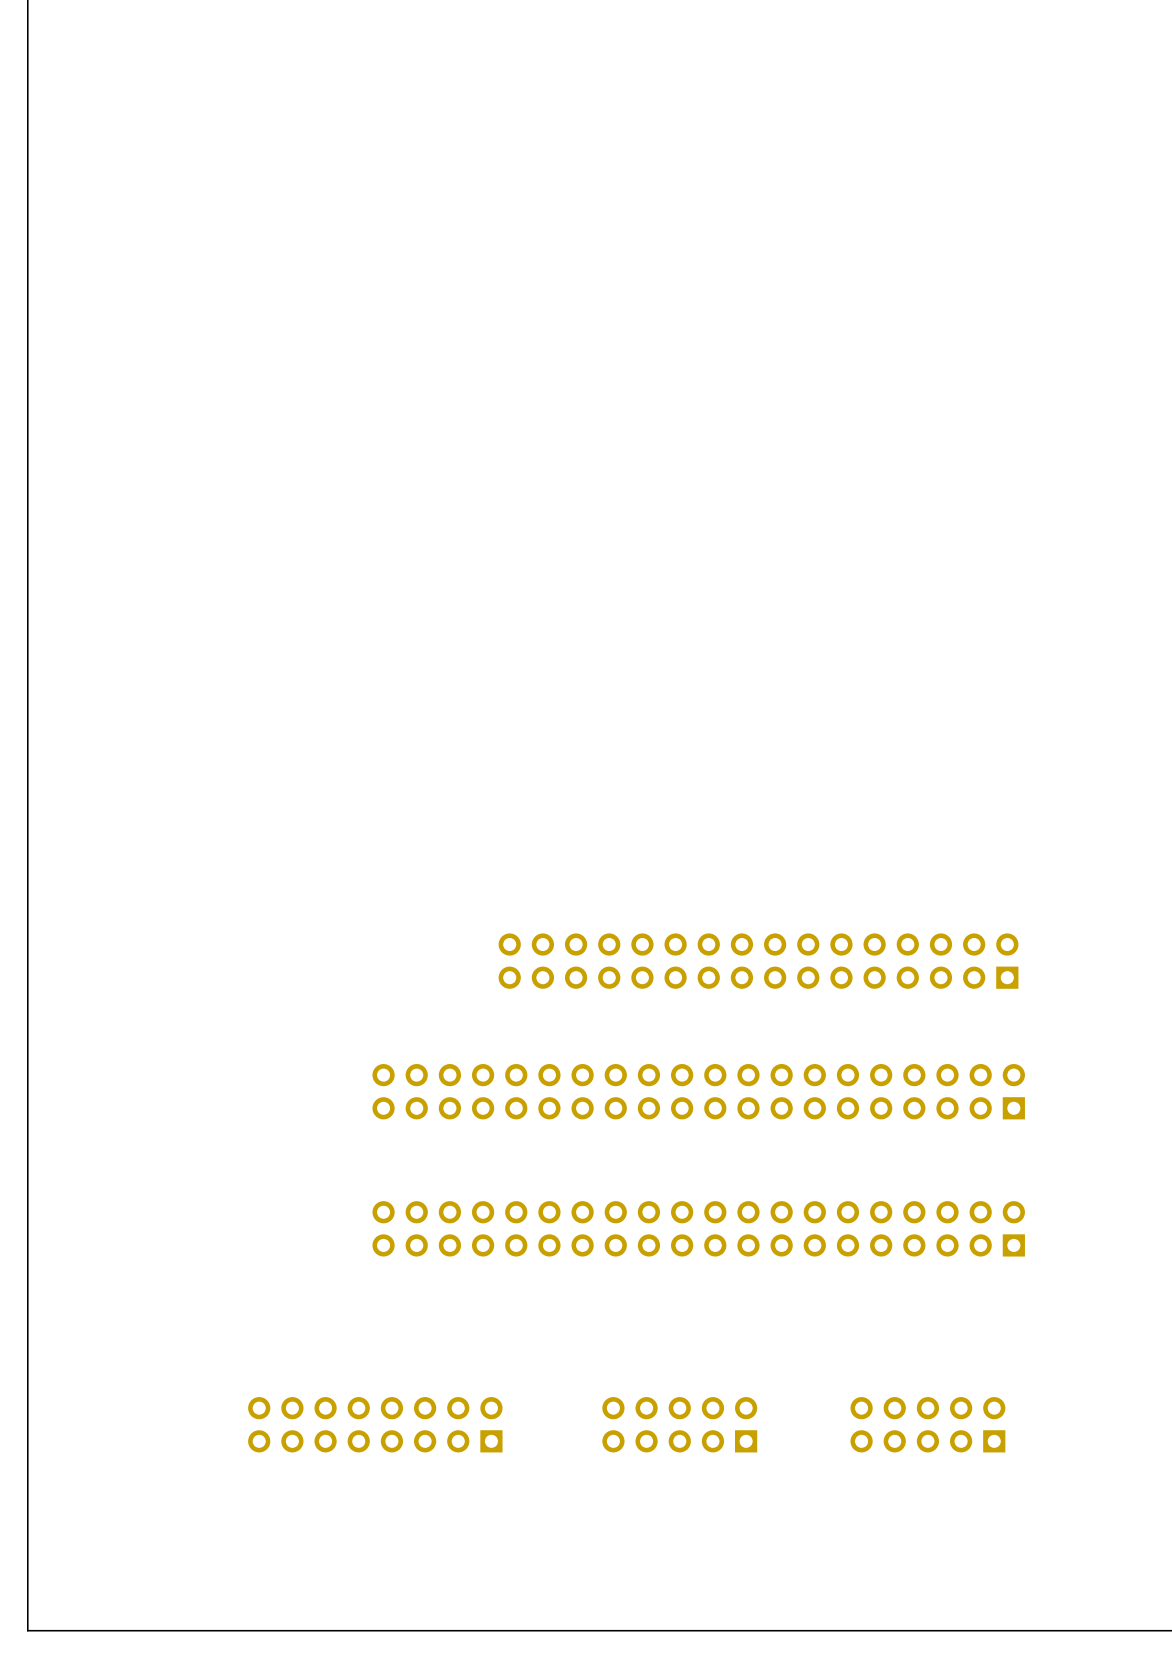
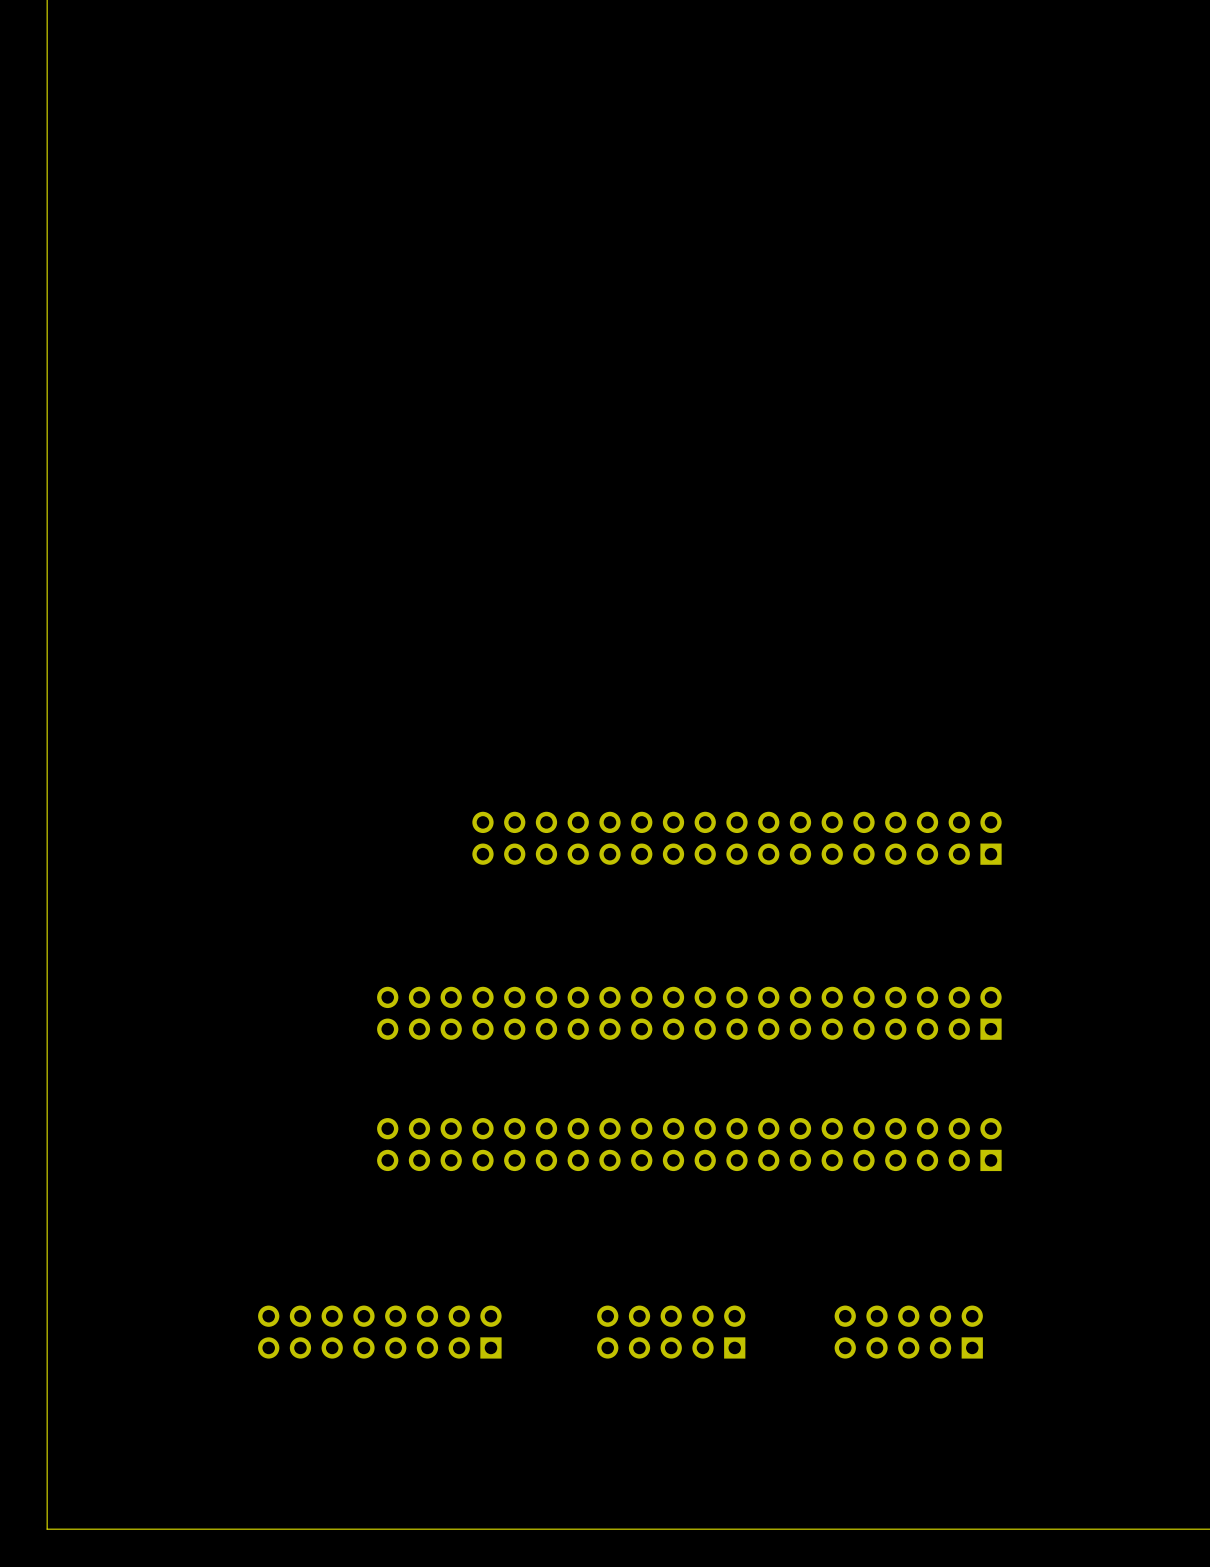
part: none -> (736, 838)
part: (758, 961) -> none

